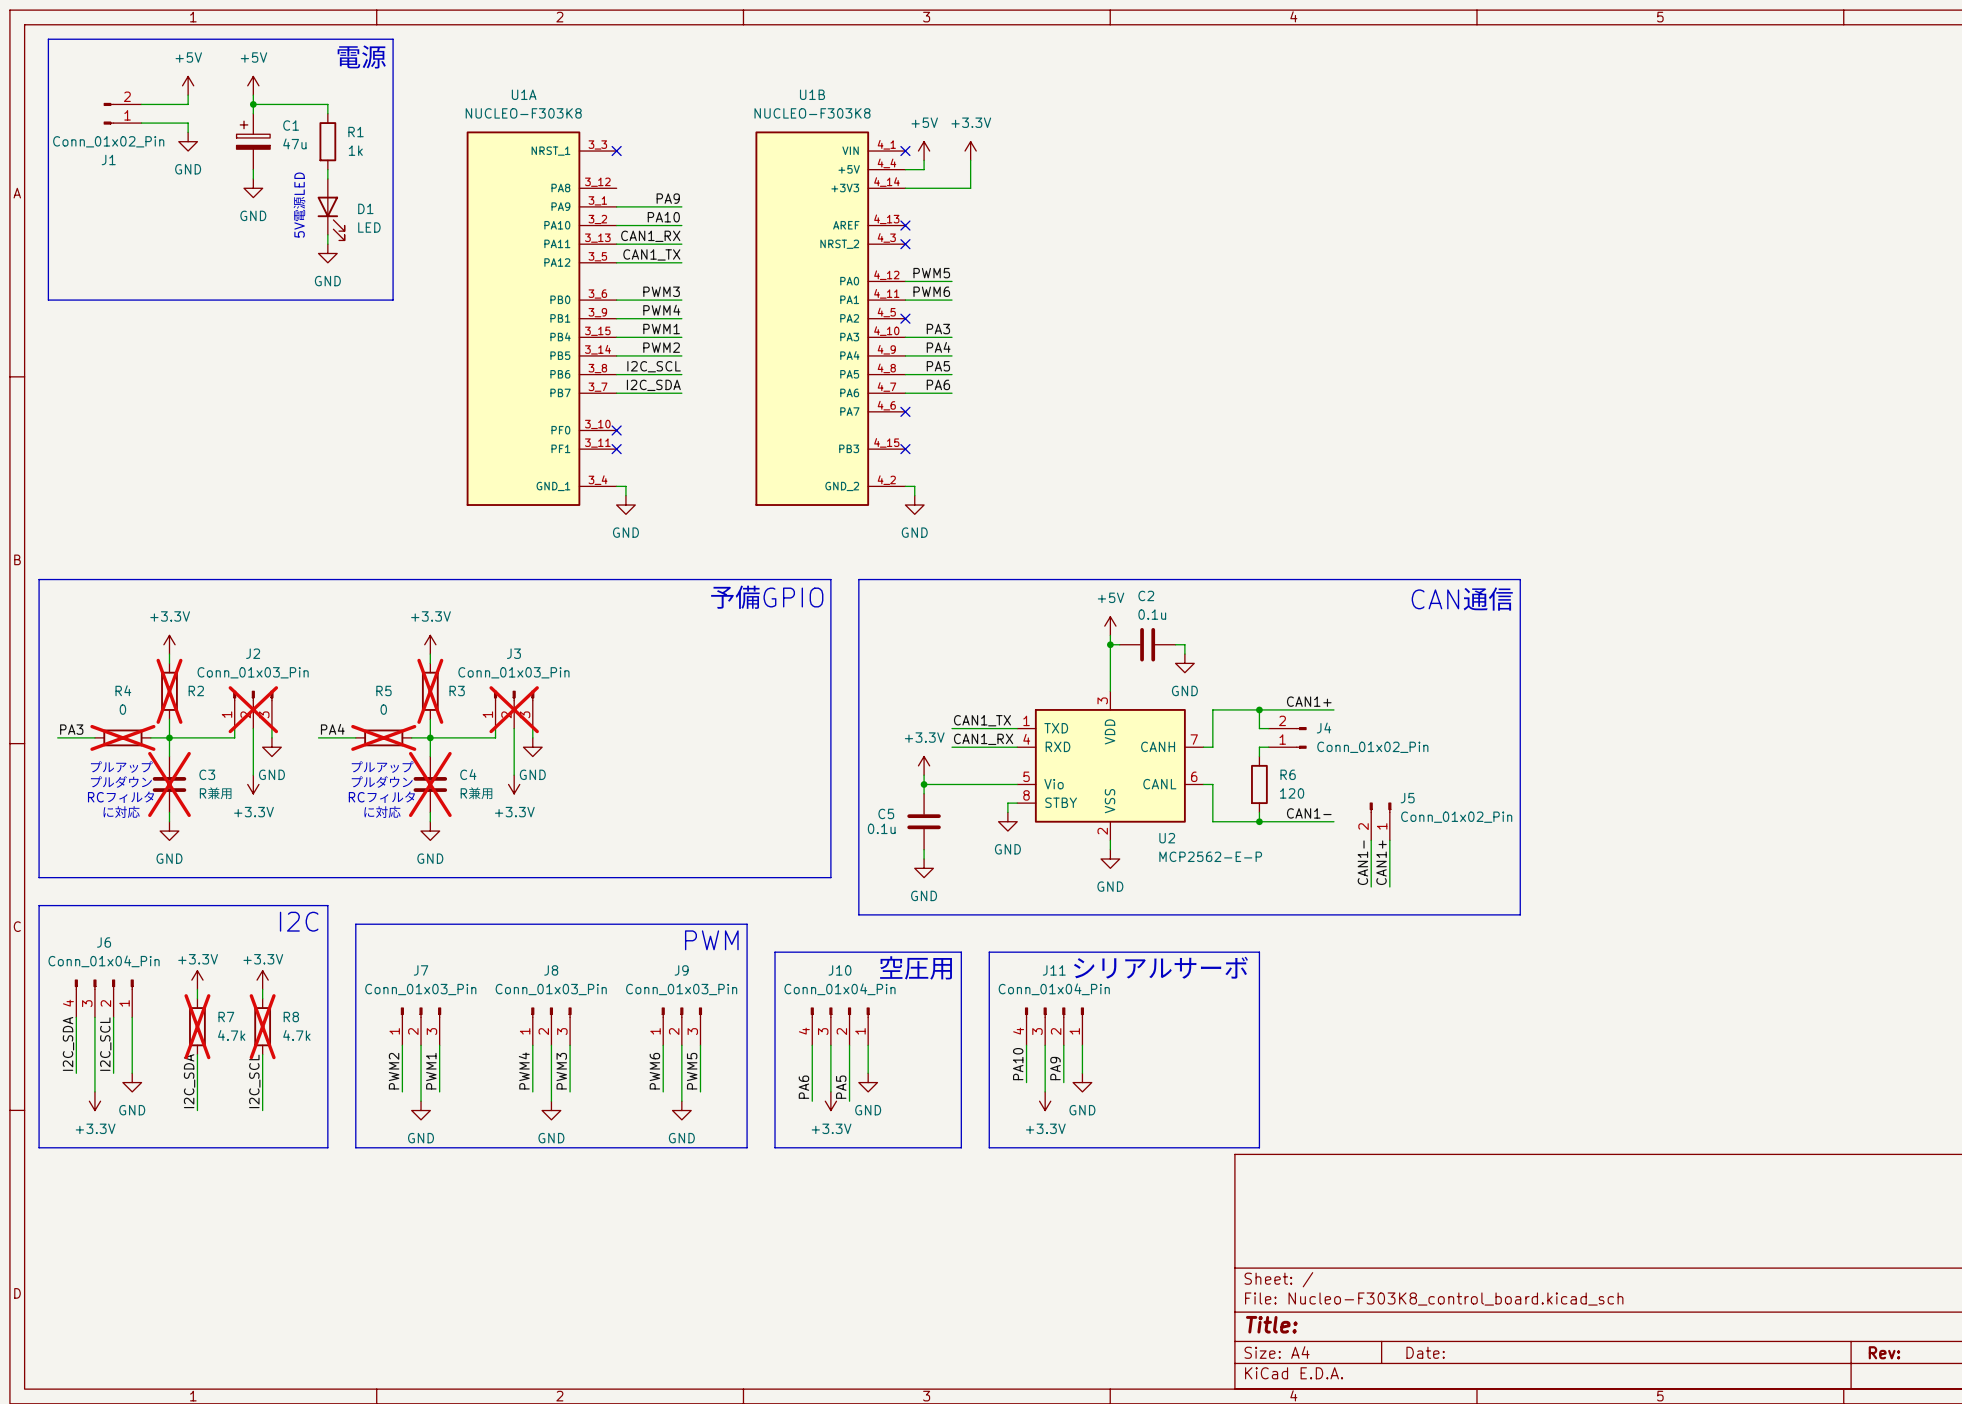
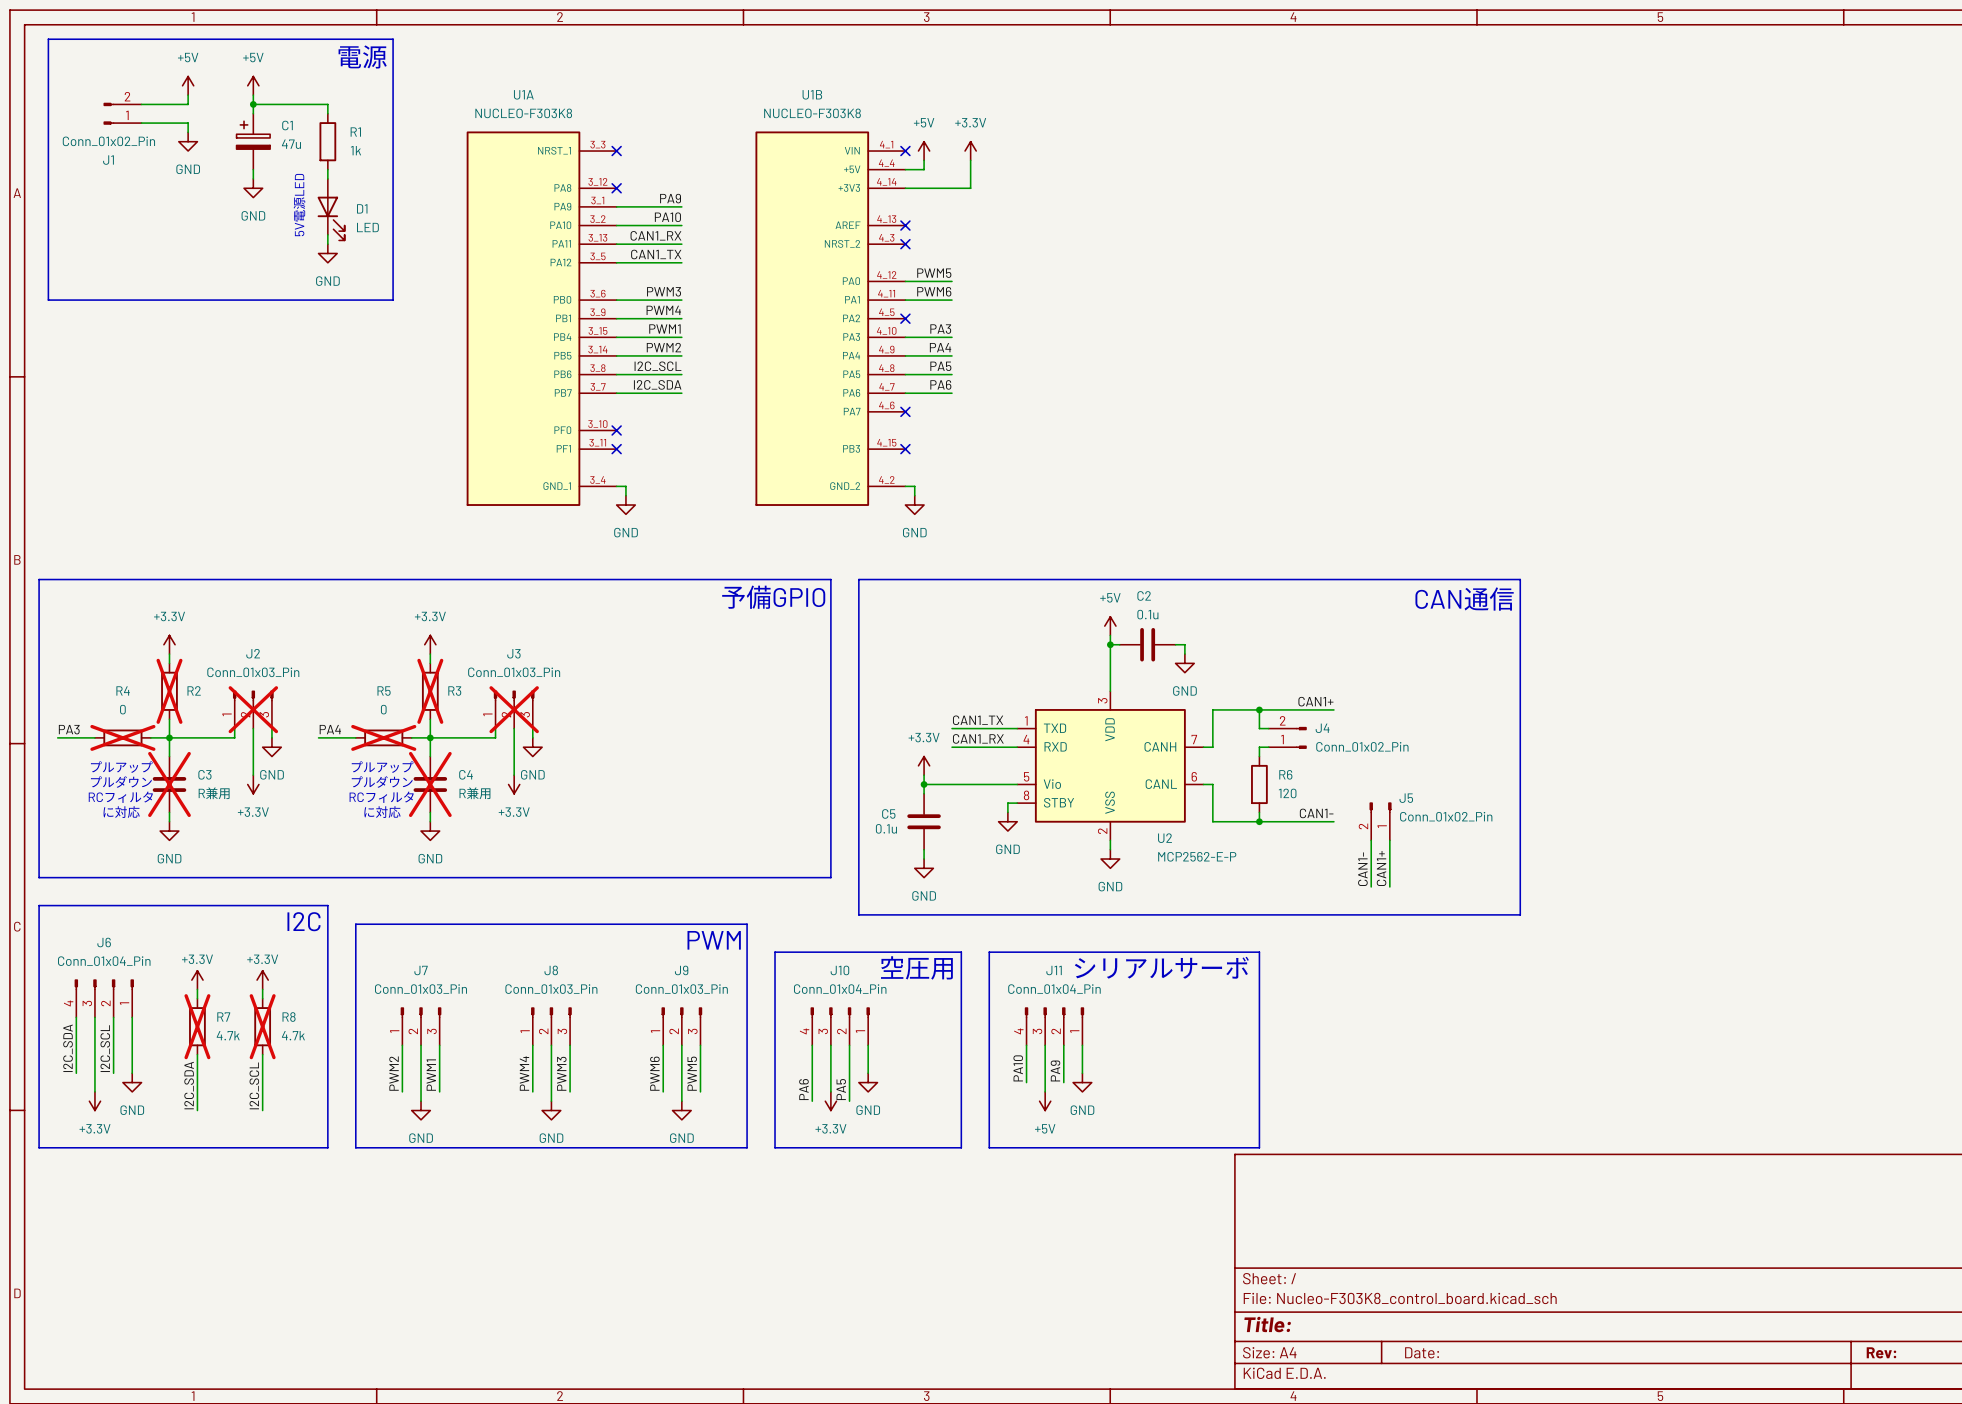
no-connect mark: none -> (616, 188)
power symbol: +3.3V (1045, 1101) -> +5V (1045, 1101)

